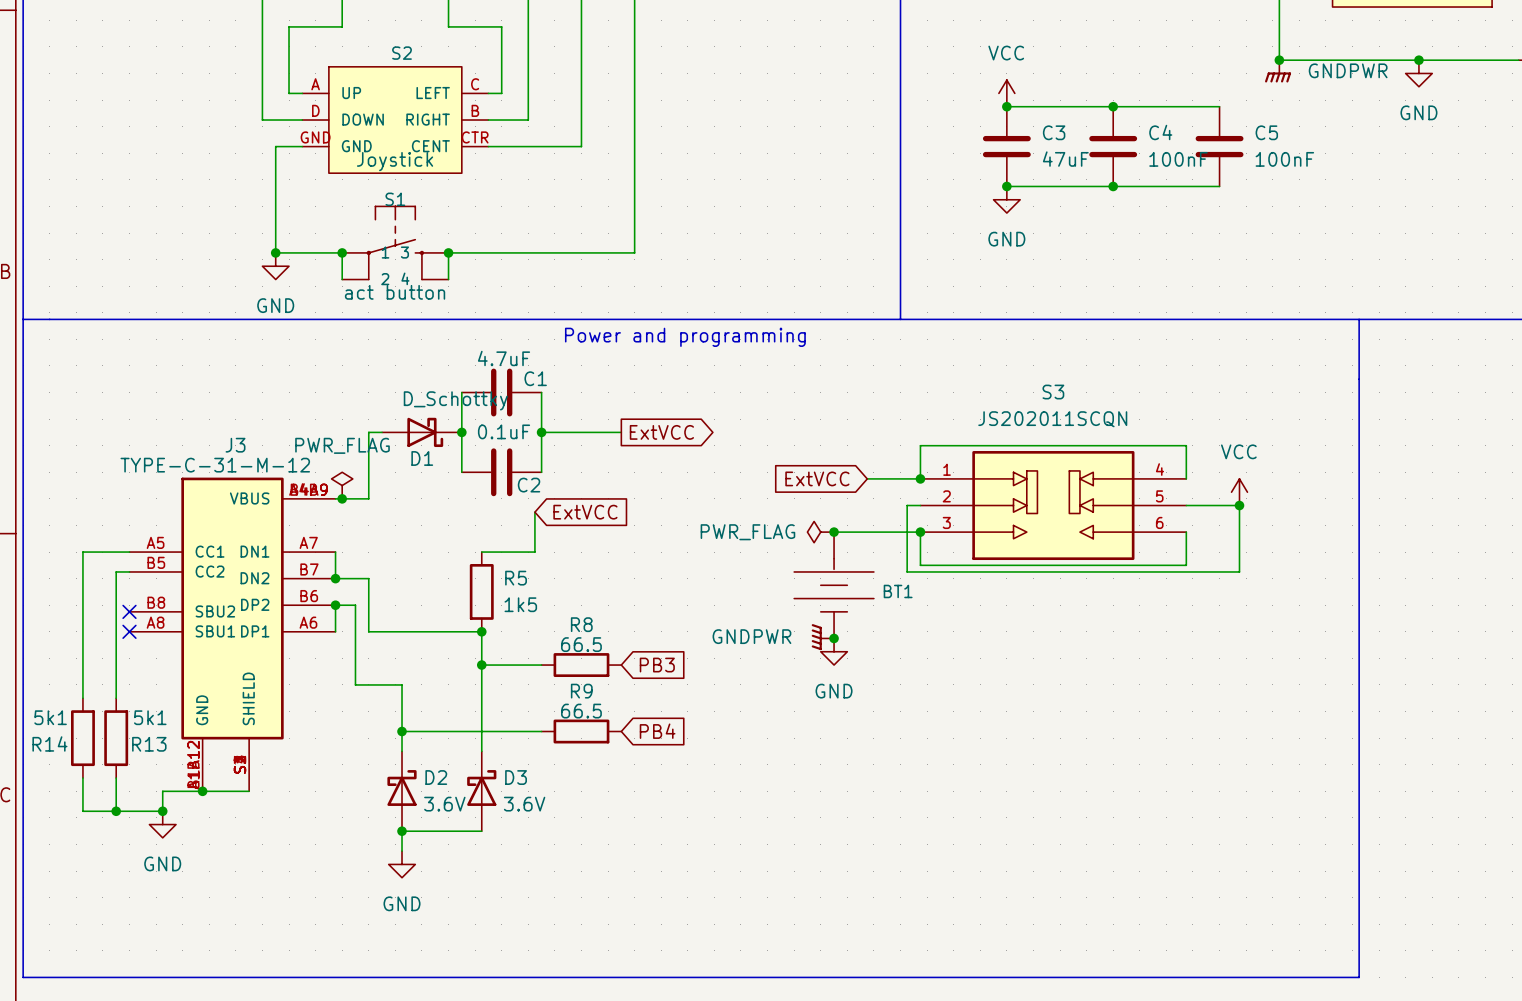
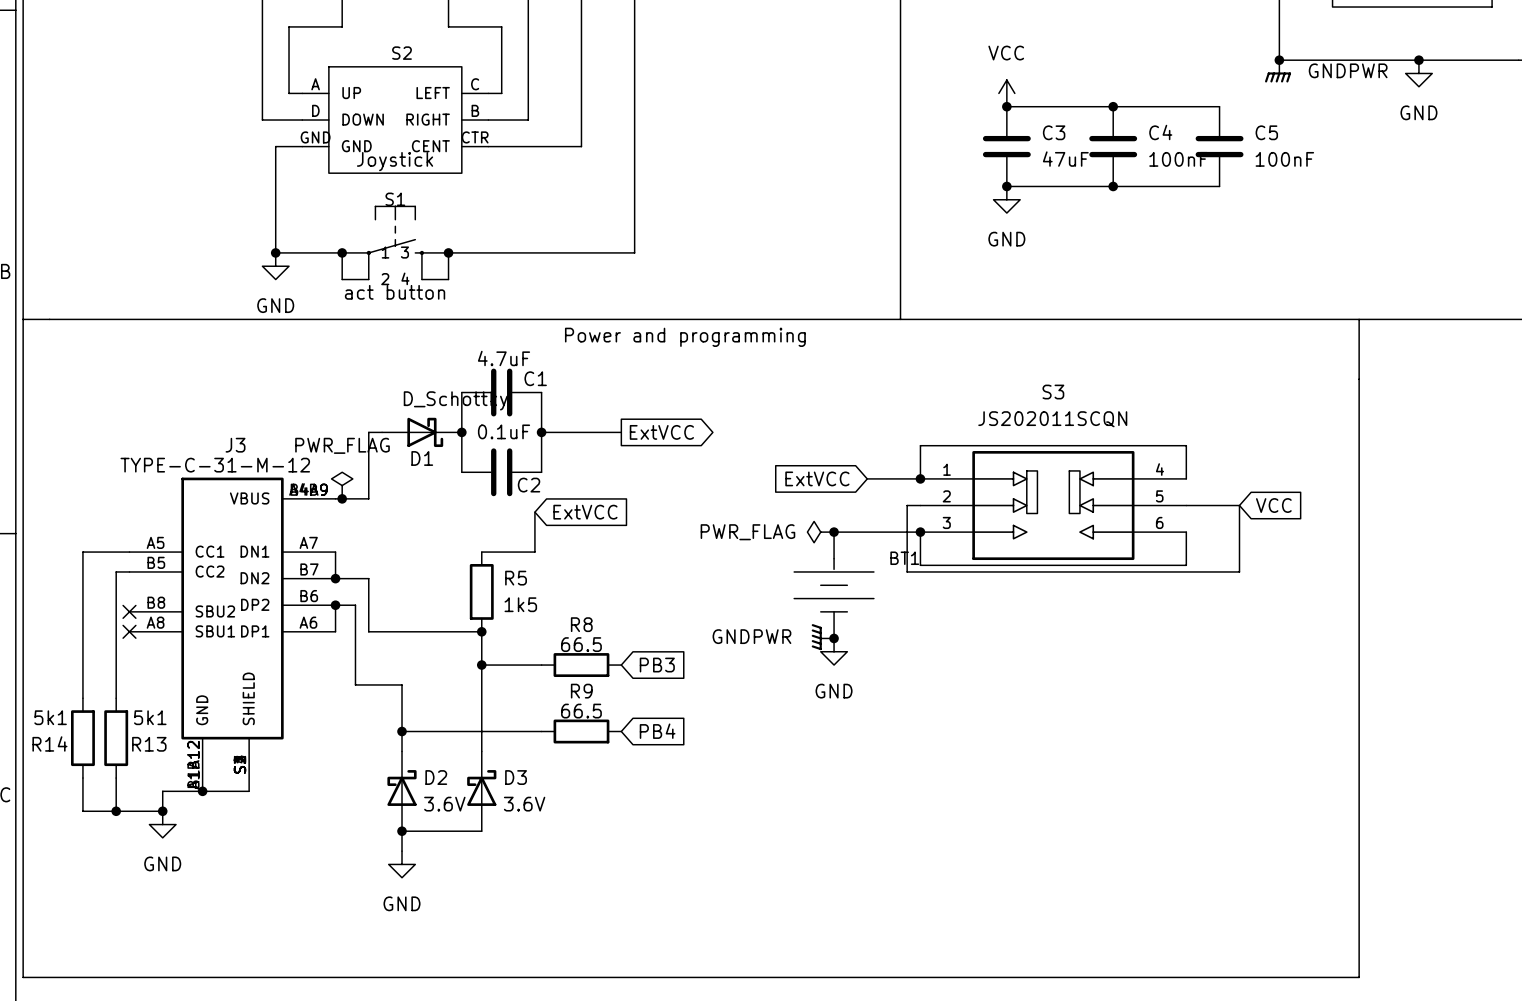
power symbol: VCC (1239, 492) -> none
junction: (1239, 505) -> none
global label: none -> VCC (1273, 505)
BT1 name position: BT1 (898, 591) -> BT1 (904, 558)

